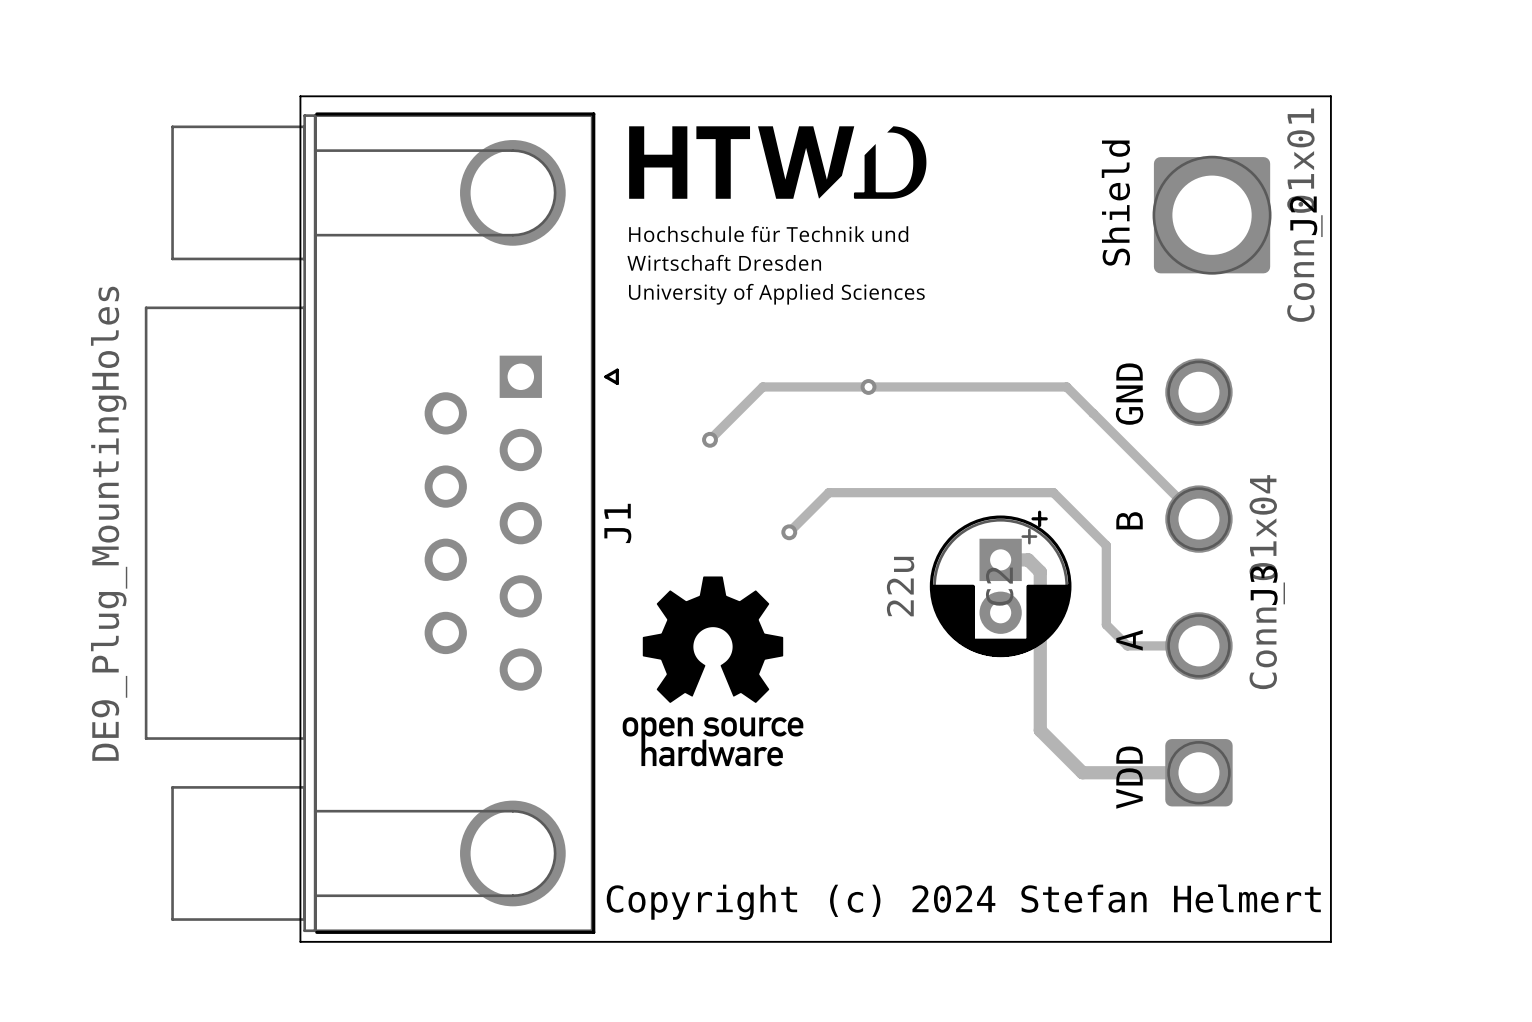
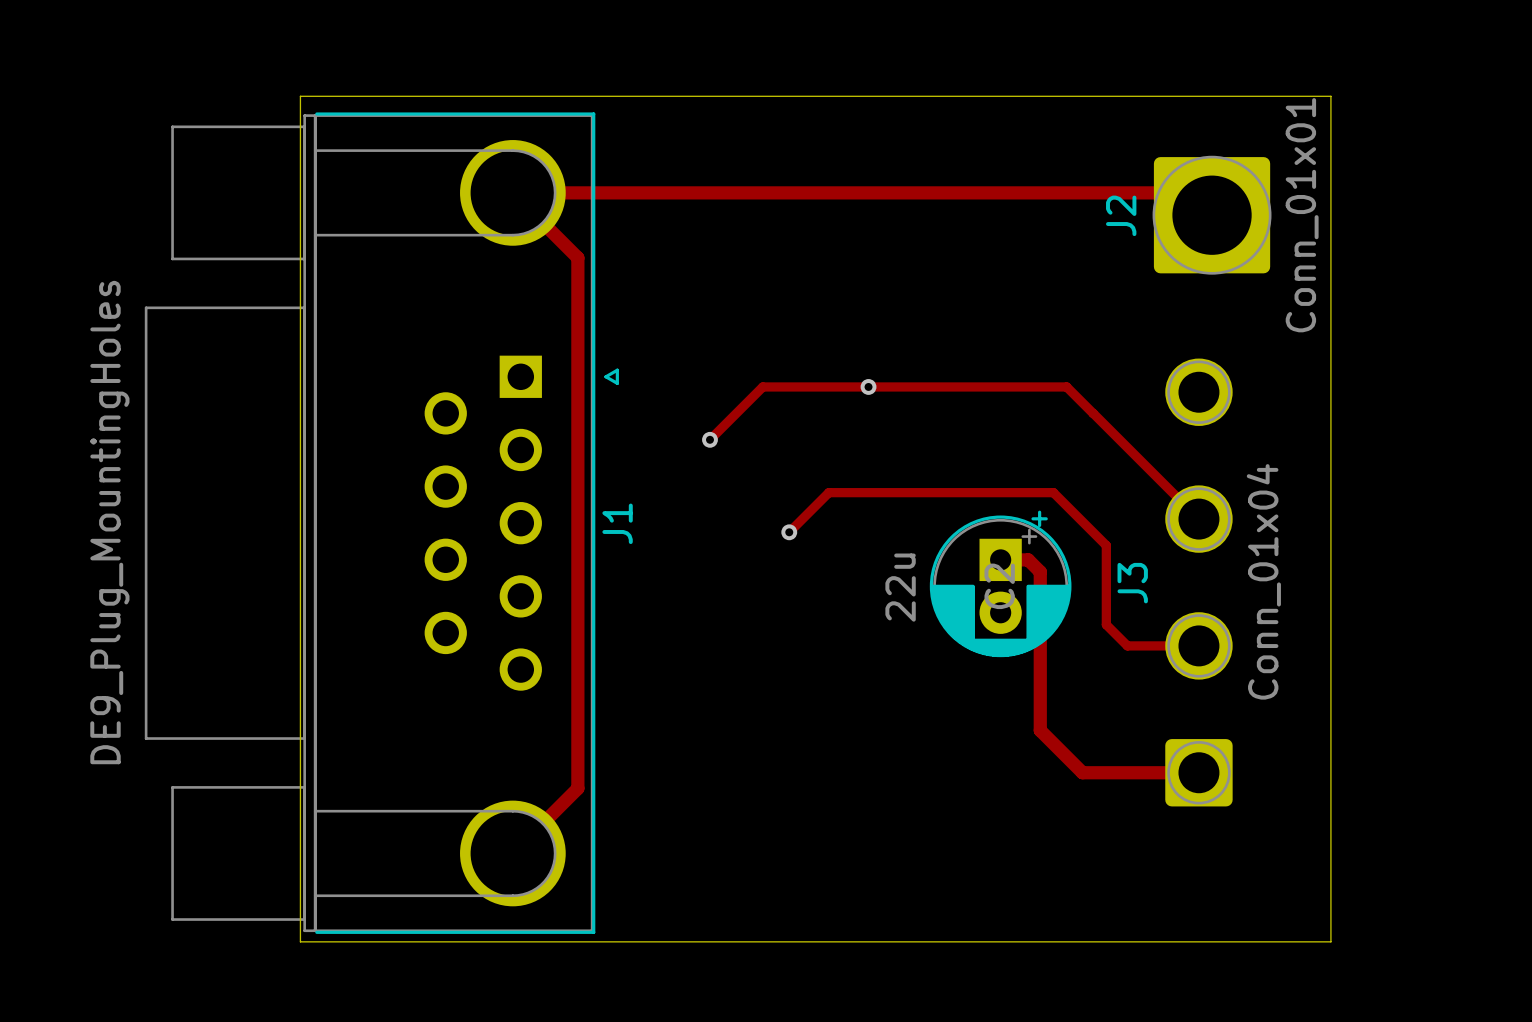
drawing: [627, 126, 927, 305] -> none
text: Shield (1115, 203) -> none
track: none -> (1212, 215) (1189, 192) (512, 192) (577, 257) (577, 788) (512, 853)
J2 name position: J2 (1303, 215) -> J2 (1121, 215)
text: GND (1129, 394) -> none
text: B (1129, 520) -> none
drawing: [622, 576, 804, 767] -> none
J3 name position: J3 (1263, 585) -> J3 (1132, 583)
text: A (1129, 640) -> none
text: VDD (1129, 777) -> none
text: Copyright (c) 2024 Stefan Helmert (963, 902) -> none

